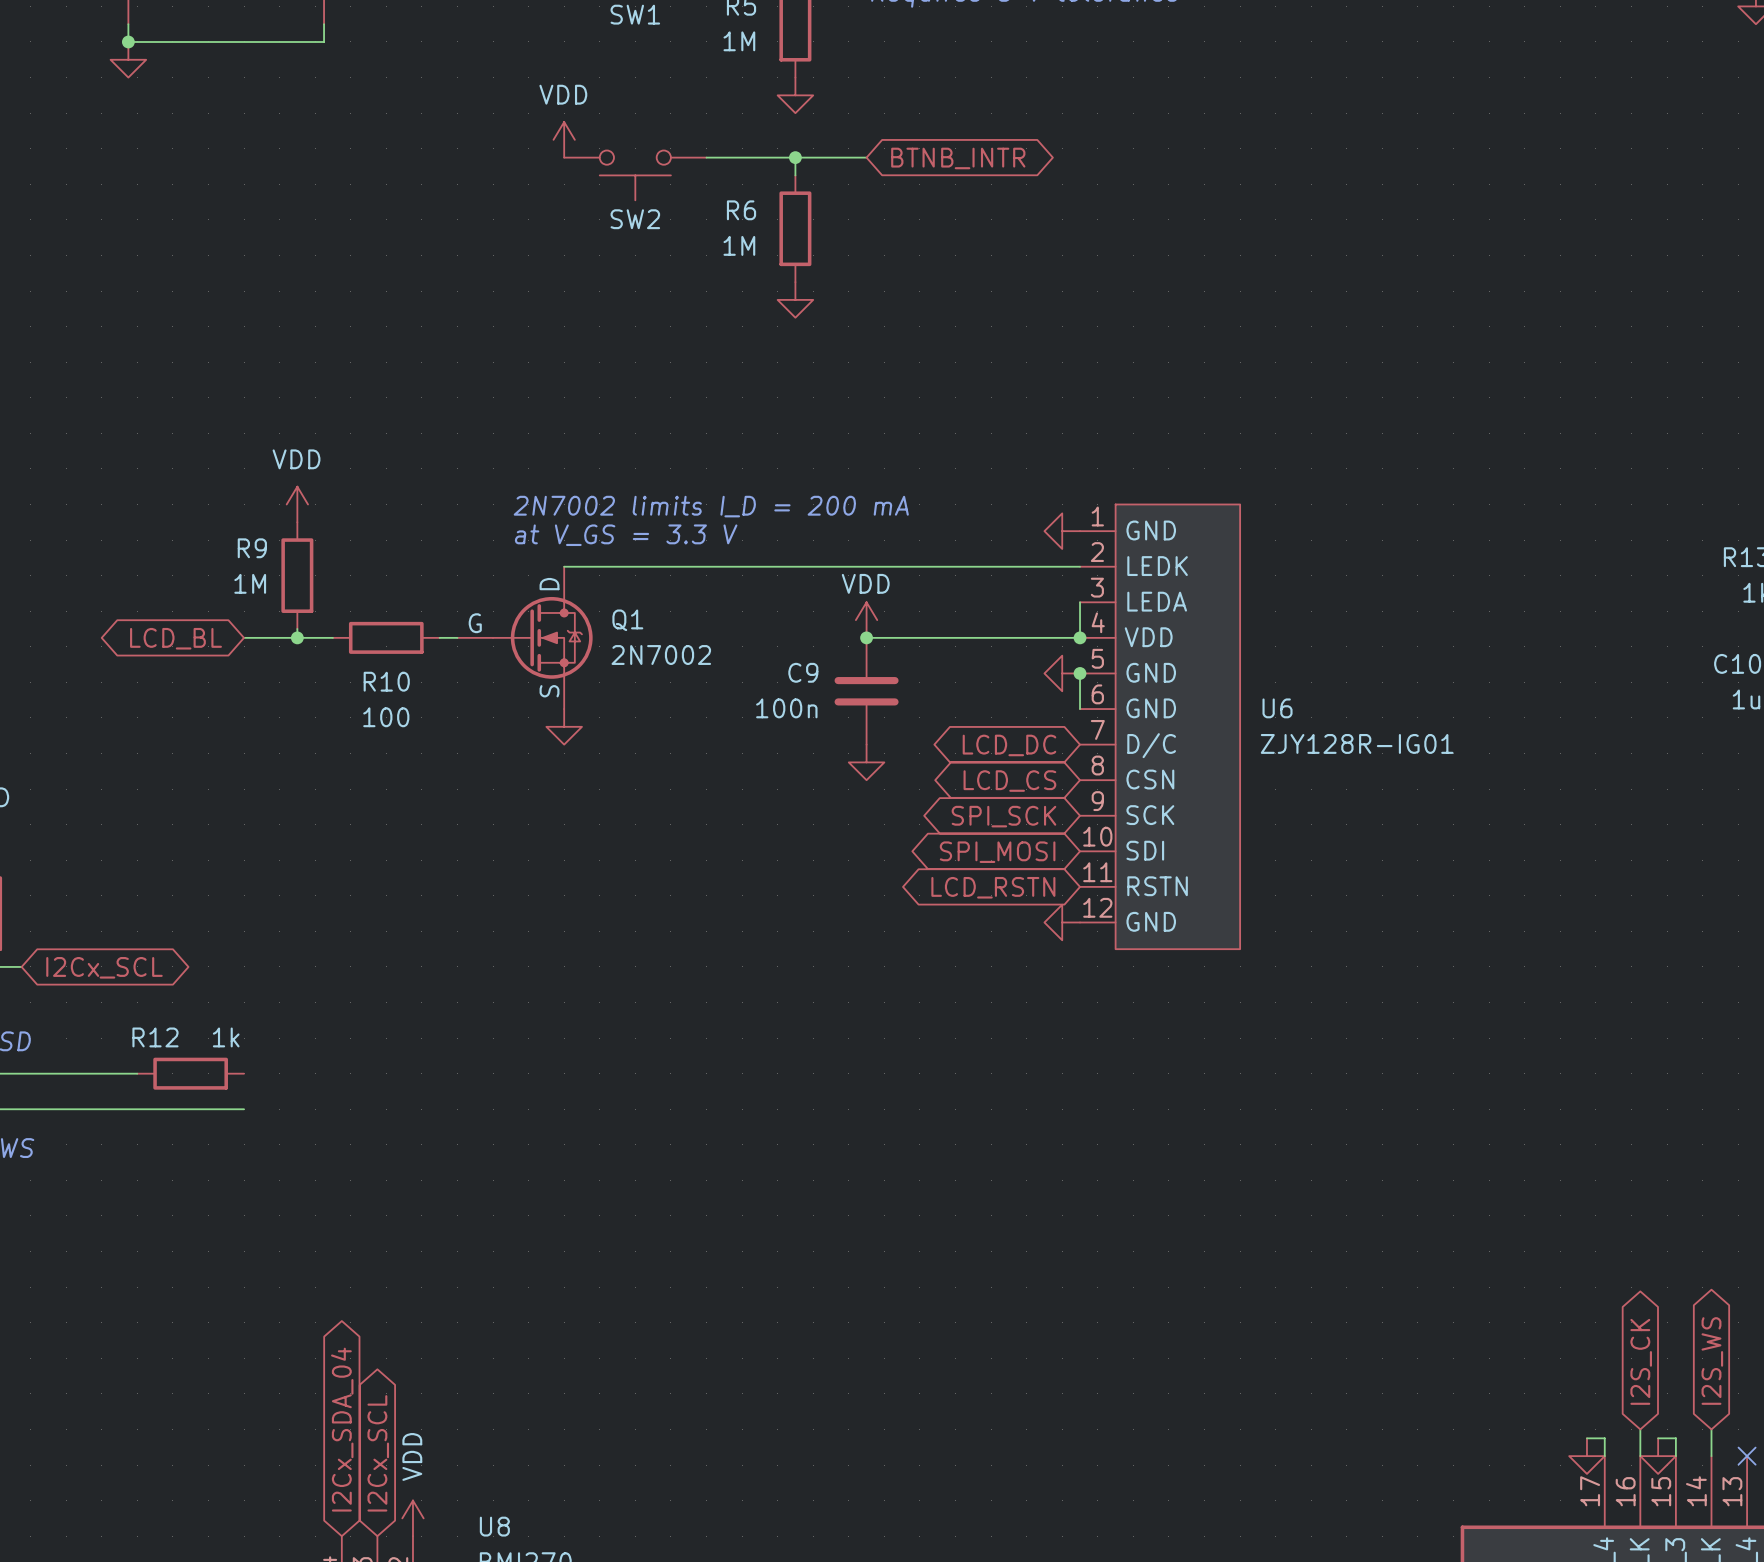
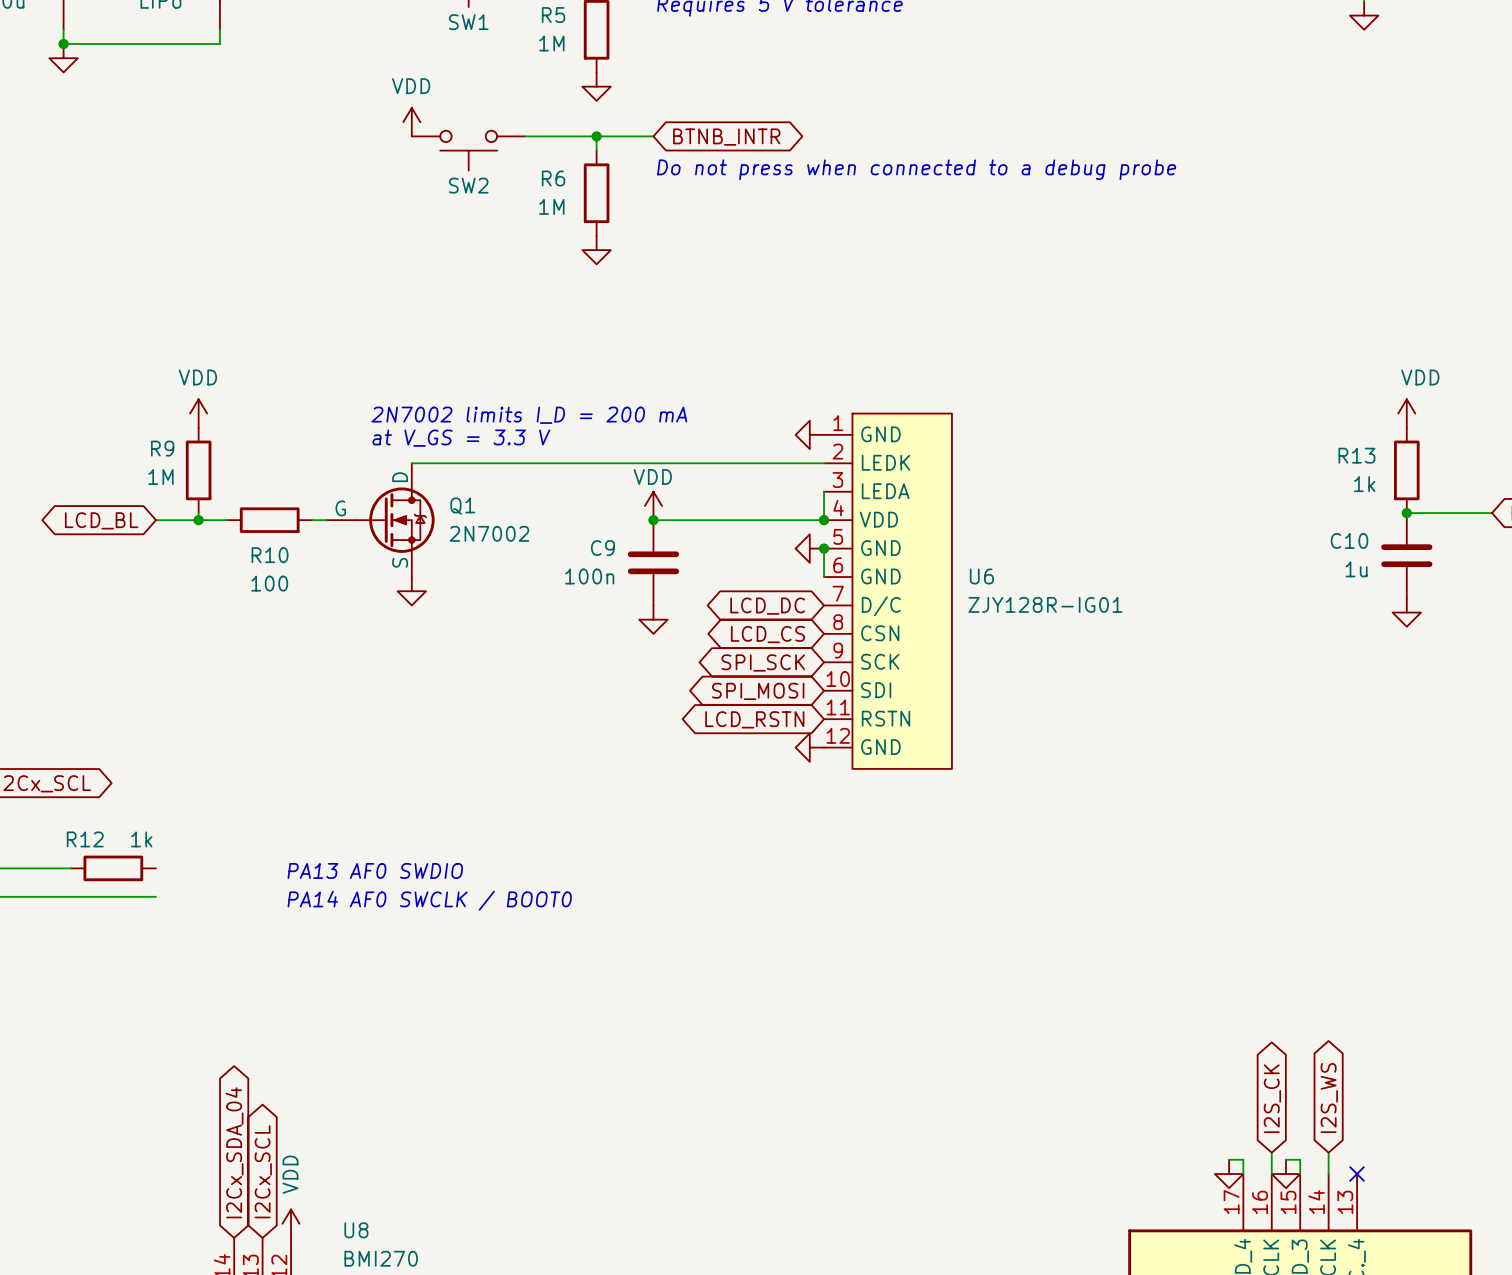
text: none -> Do not press when connected to a debug probe (916, 169)
text: none -> PA13 AF0 SWDIO (375, 870)
text: none -> PA14 AF0 SWCLK / BOOT0 (429, 900)

